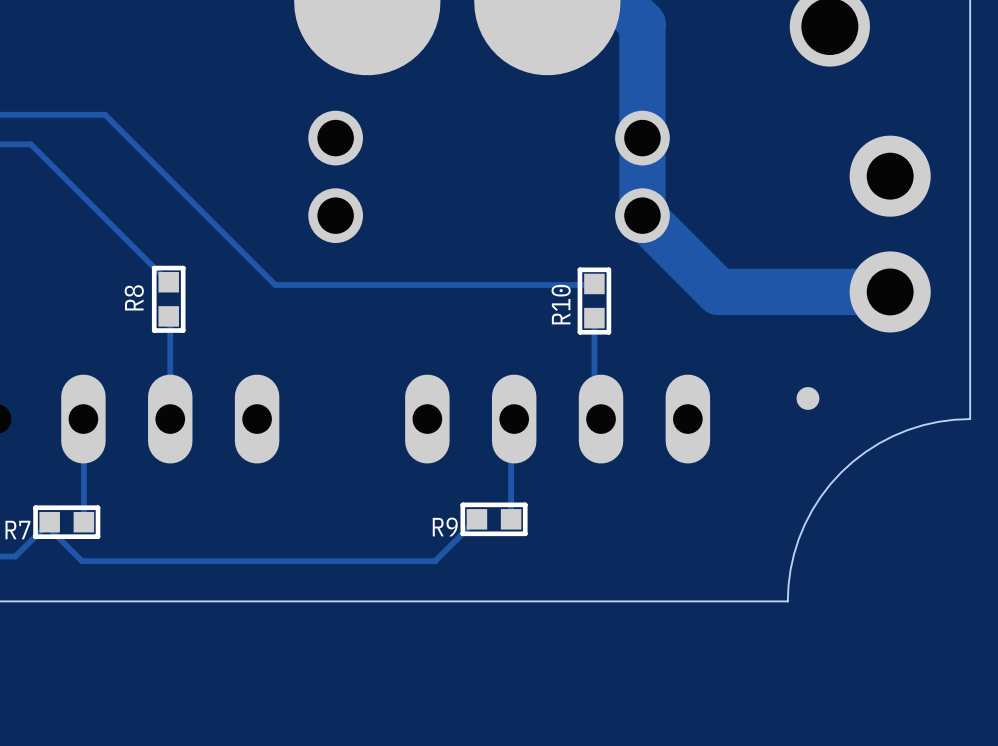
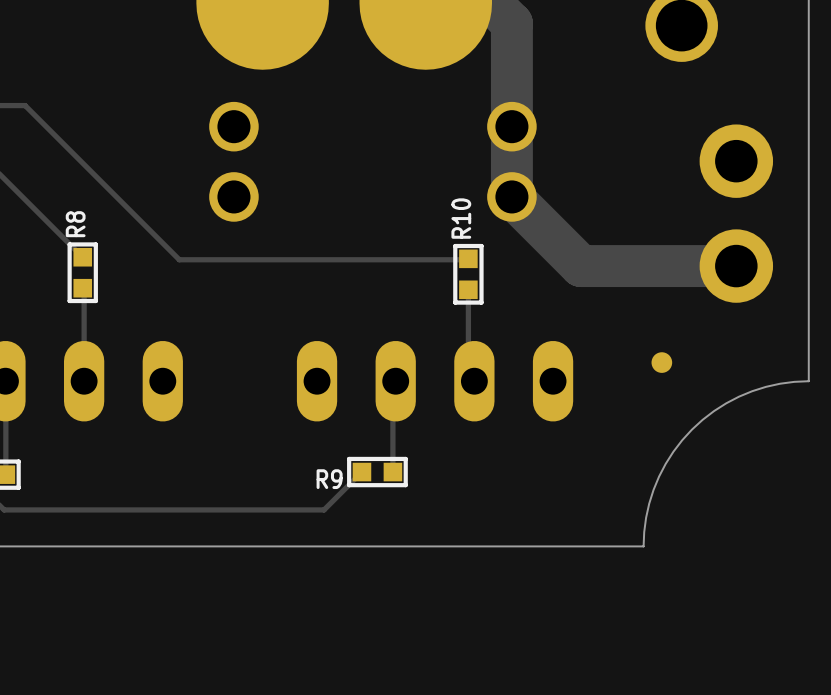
R8 name position: R8 (134, 297) -> R8 (75, 224)
R10 name position: R10 (561, 304) -> R10 (461, 218)

